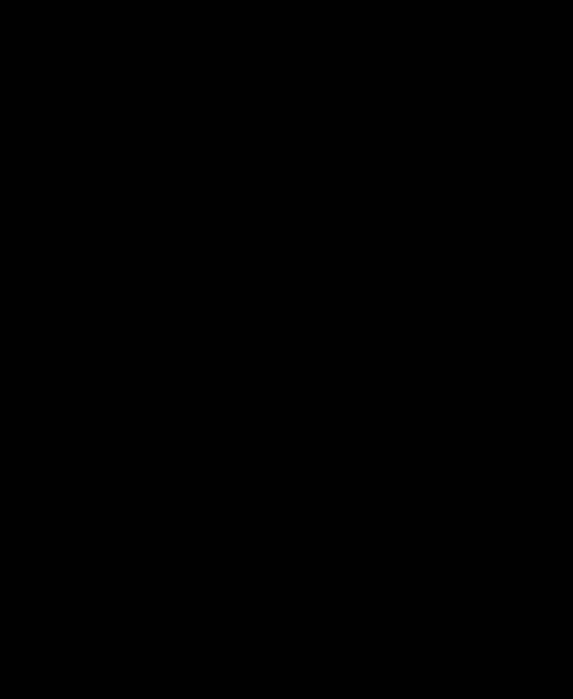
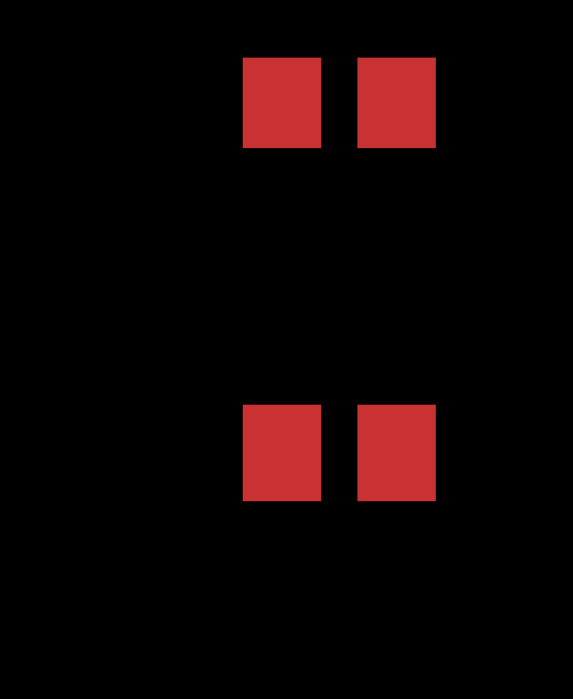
part: none -> (339, 102)
part: none -> (339, 452)

